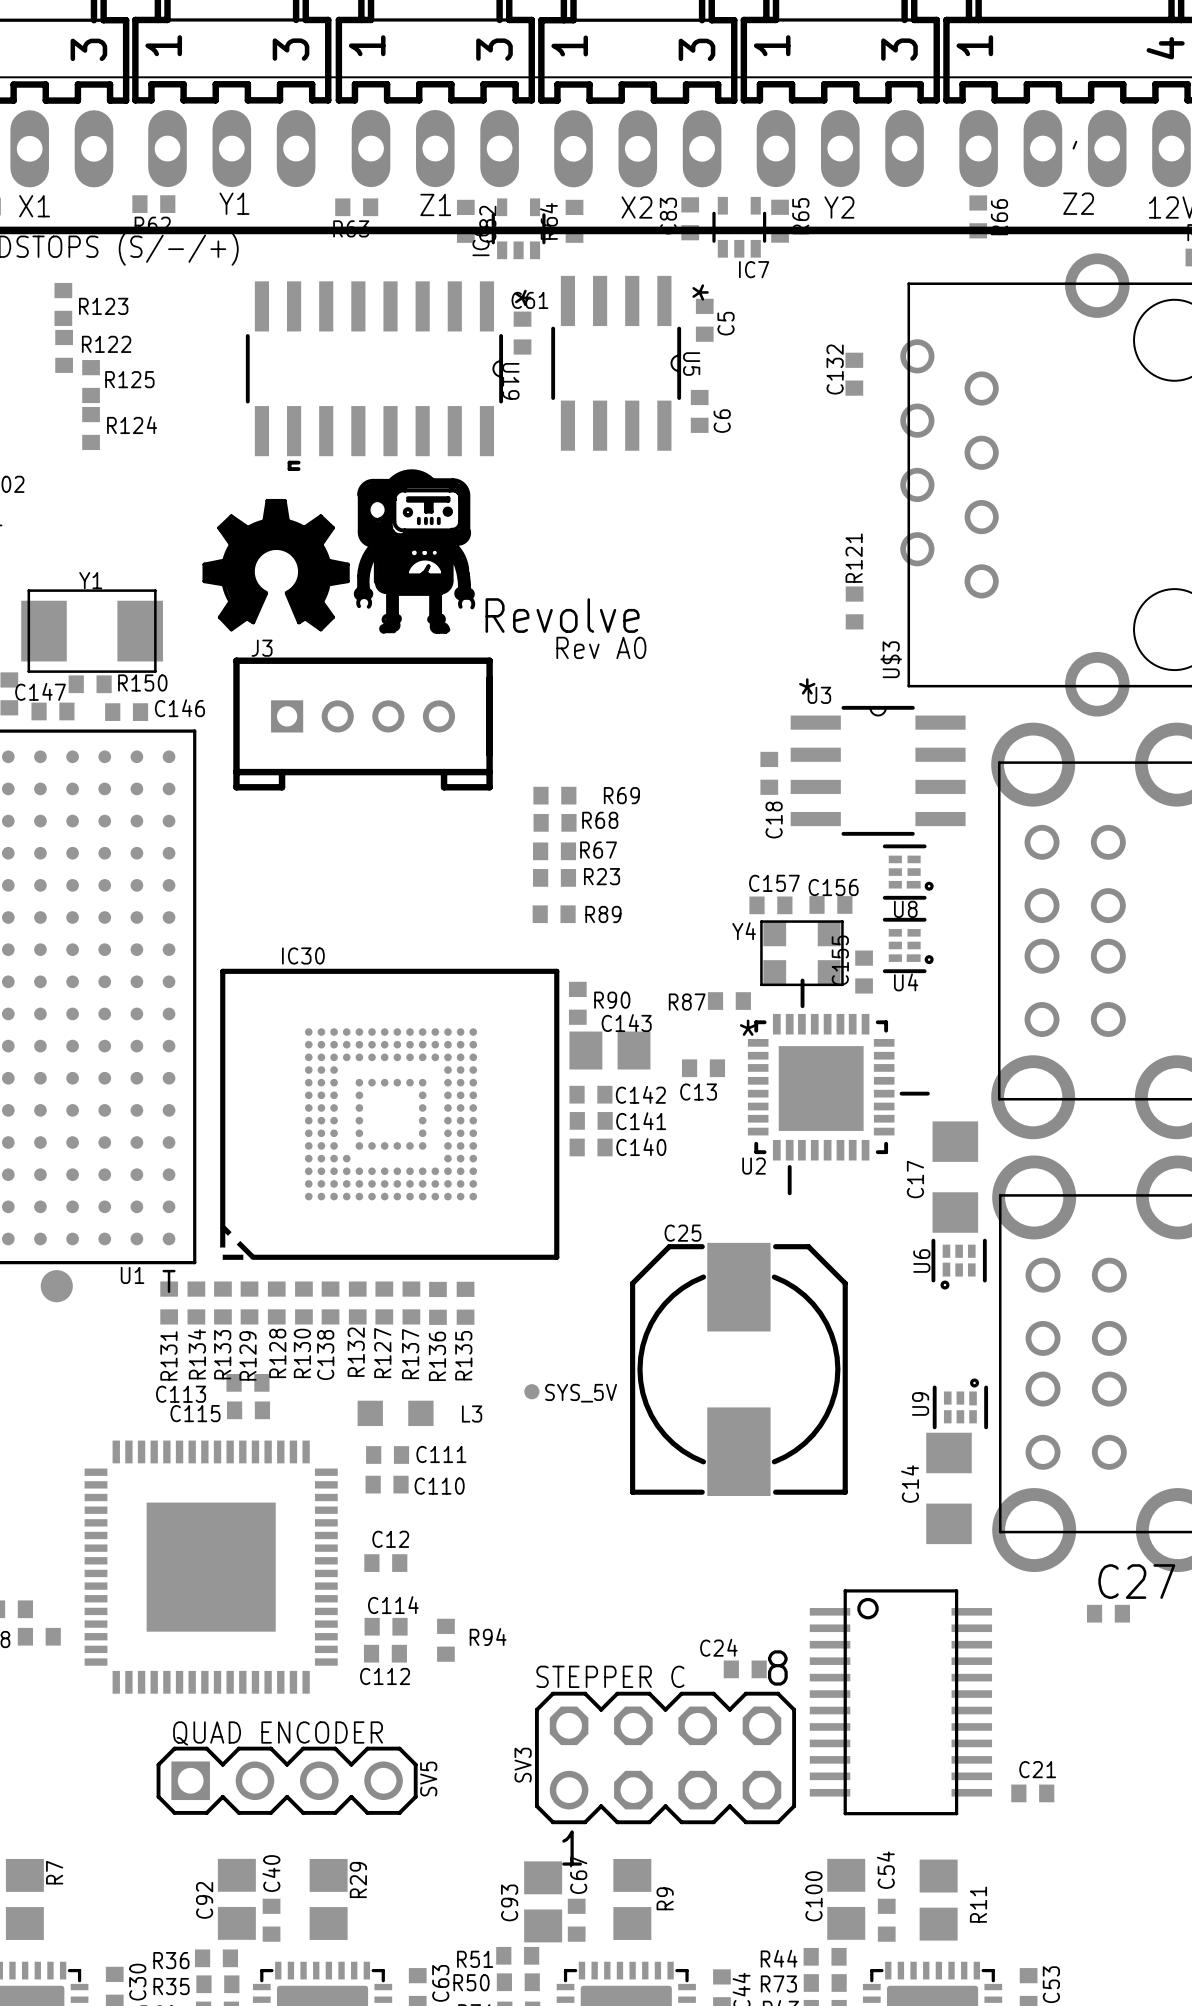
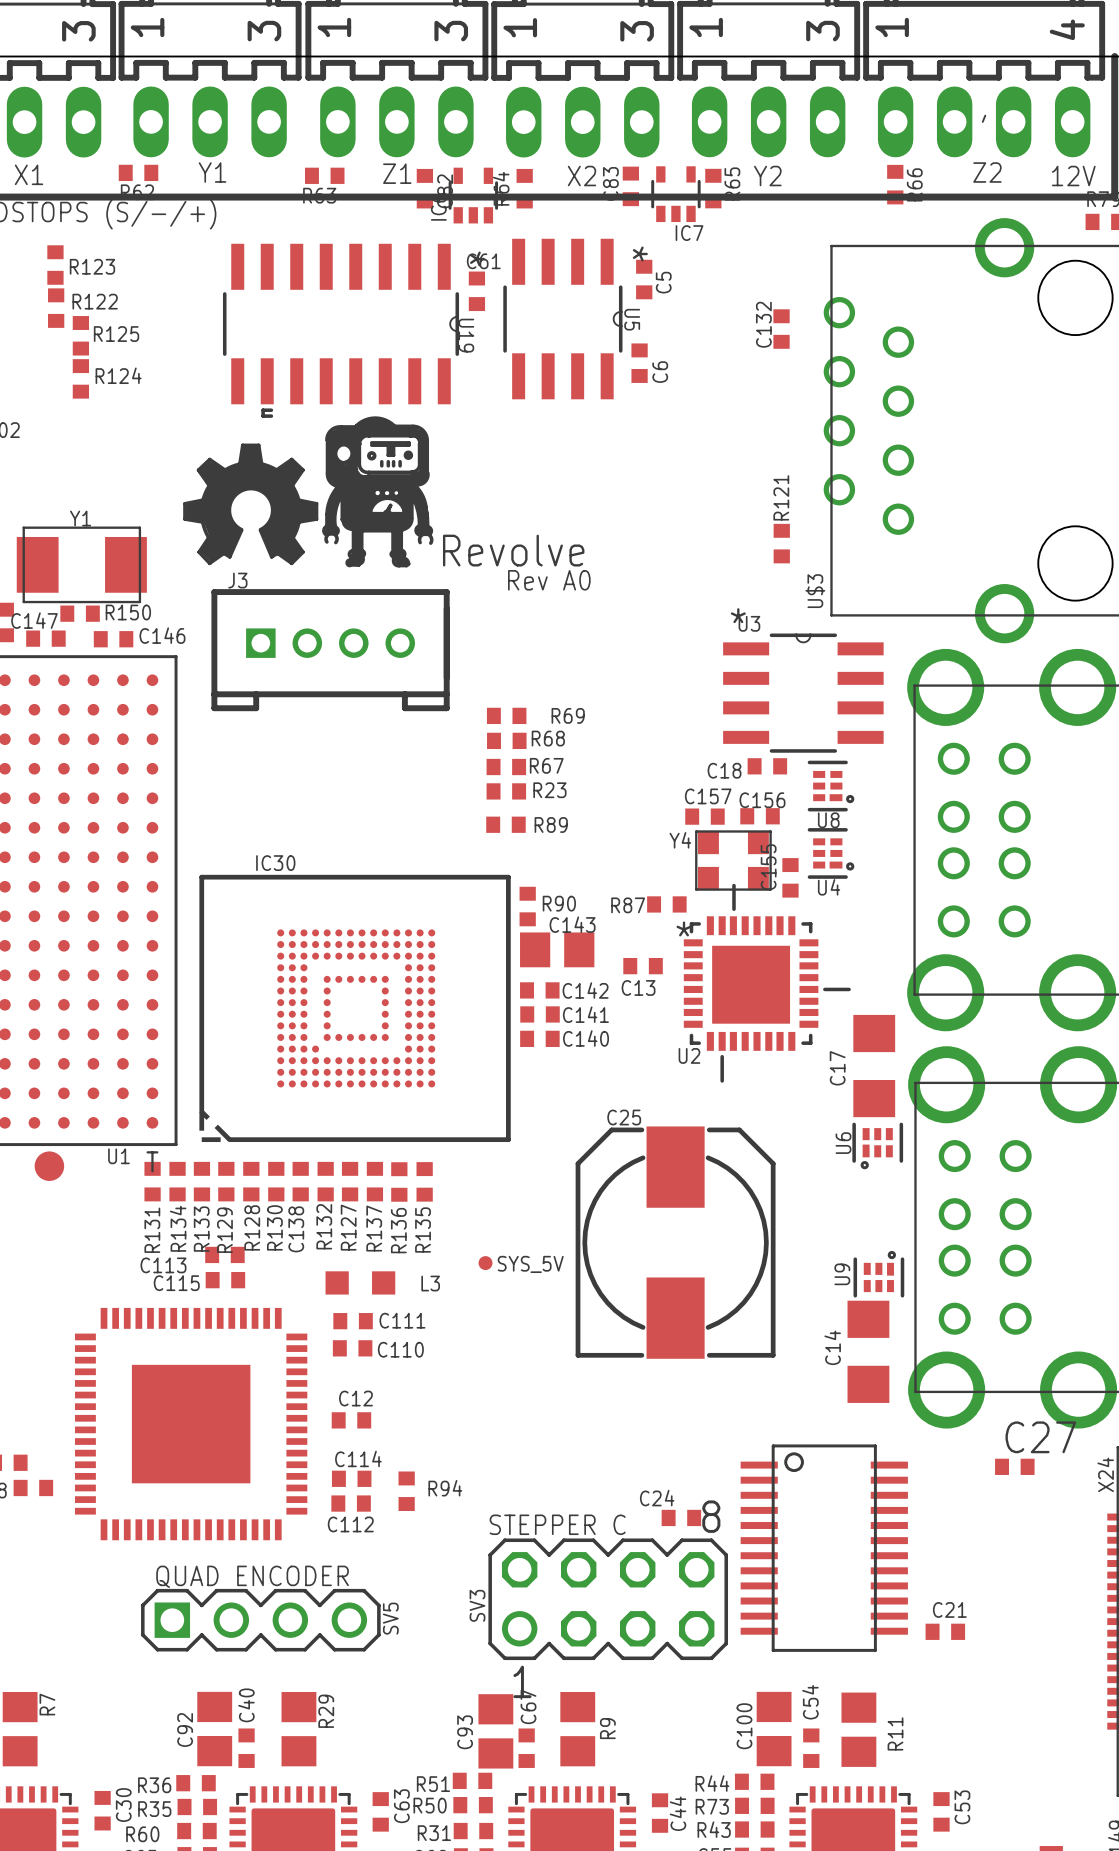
C18 rotation: 0° (769, 773) -> 90° clockwise (767, 766)
C18 position: (769, 773) -> (767, 766)

